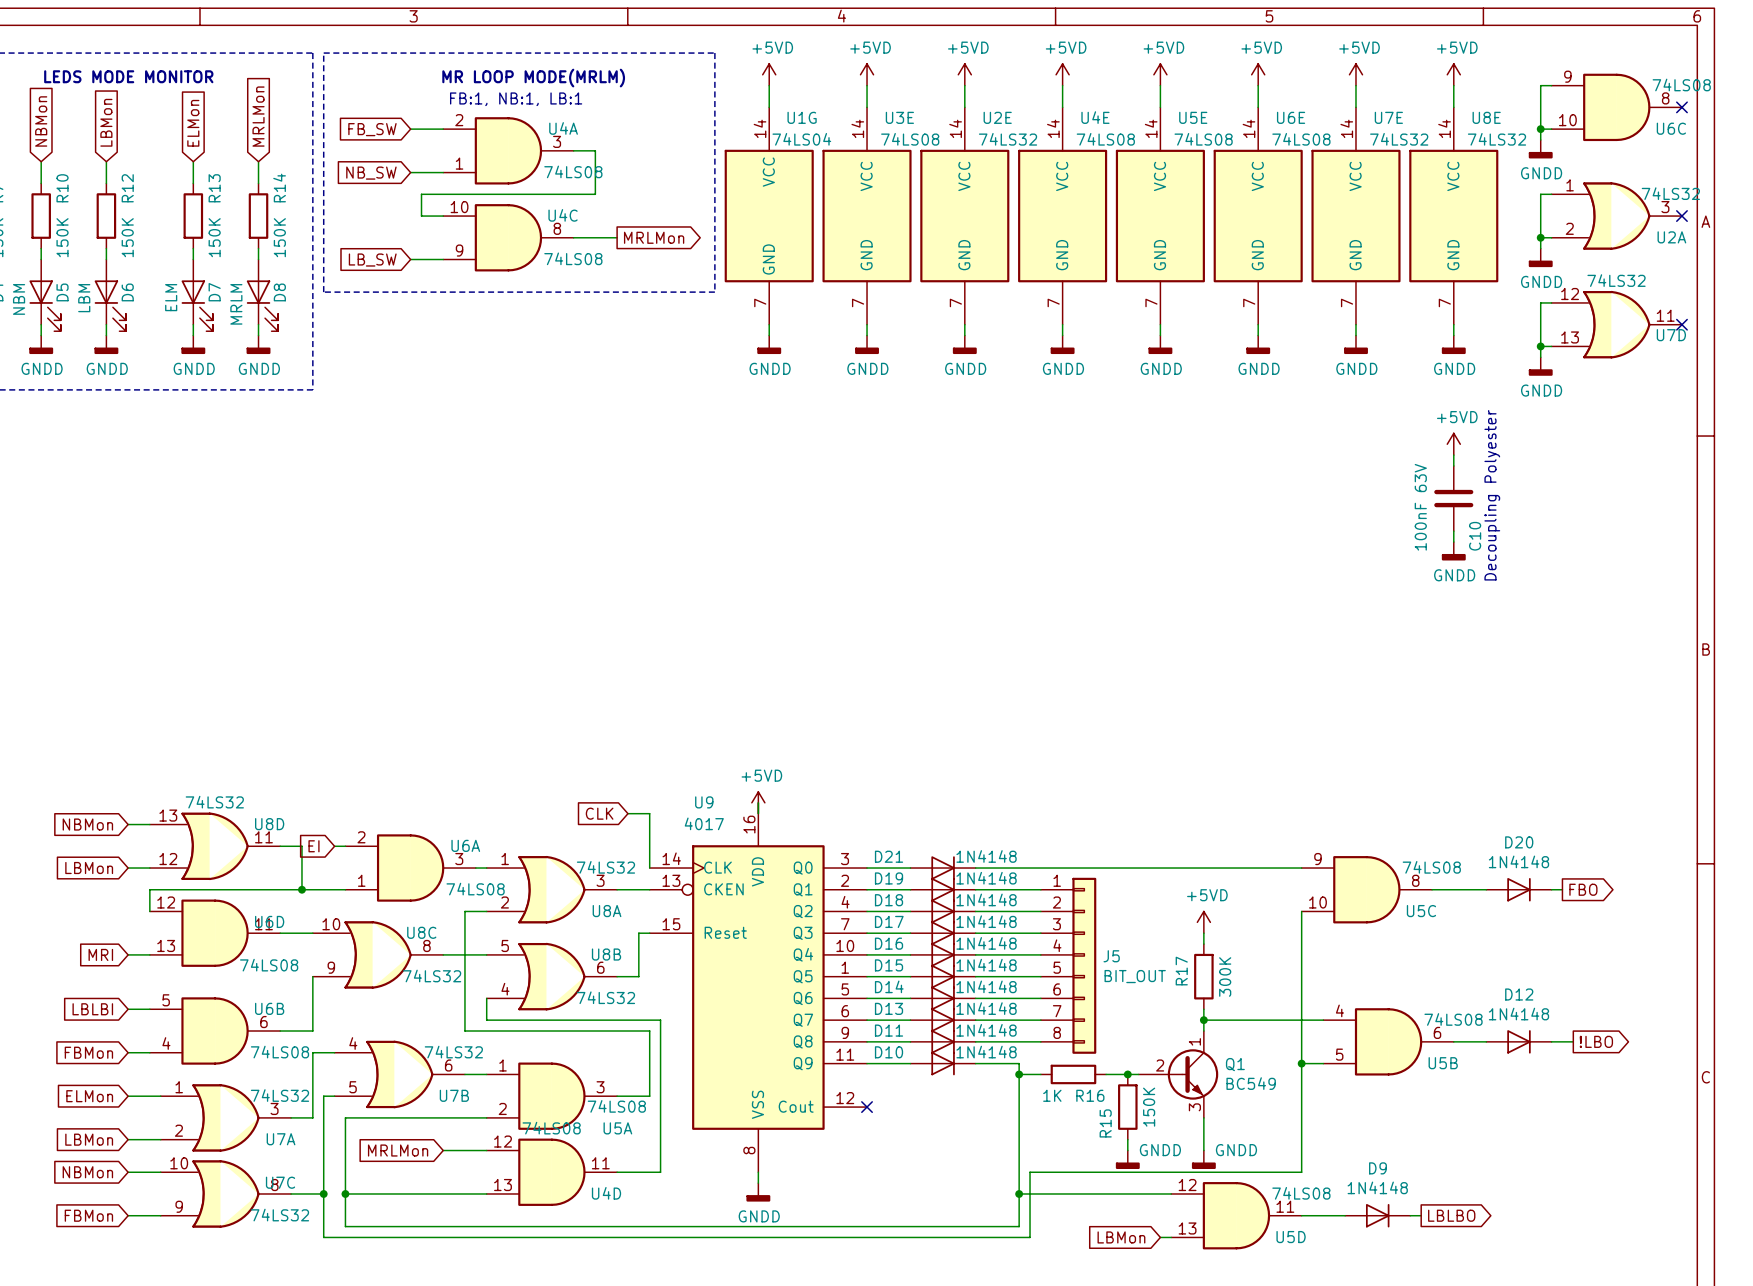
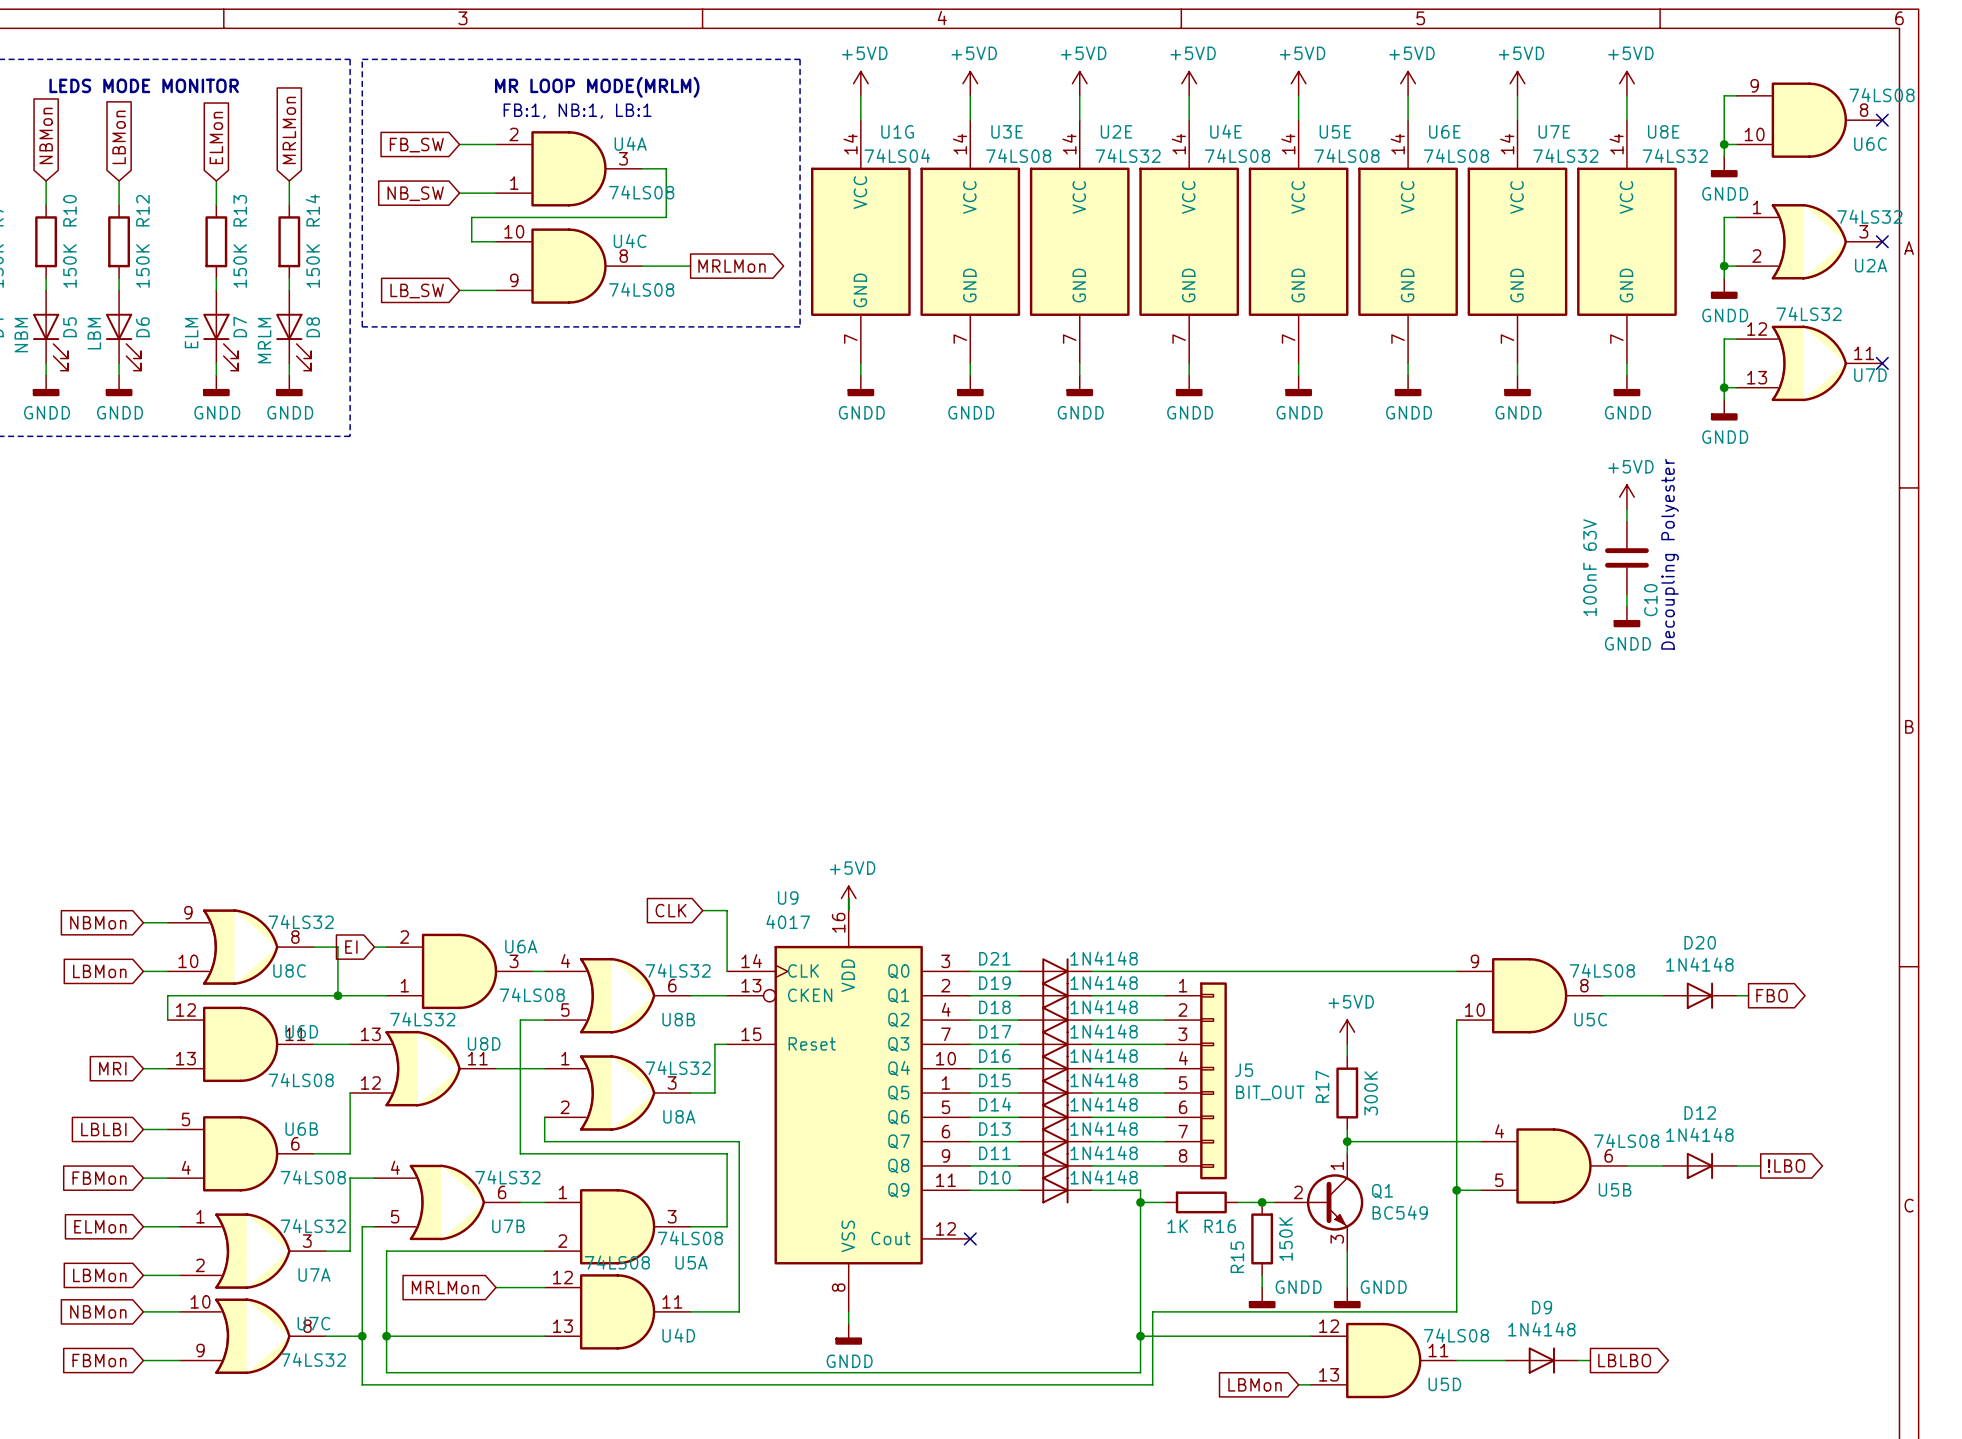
U8D position: (215, 846) -> (423, 1068)
U8A position: (551, 889) -> (617, 1093)
U8C flip: as is (378, 954) -> up-down (240, 947)
U8C position: (378, 954) -> (240, 947)
U8B flip: as is (551, 976) -> up-down (617, 995)
U8B position: (551, 976) -> (617, 995)

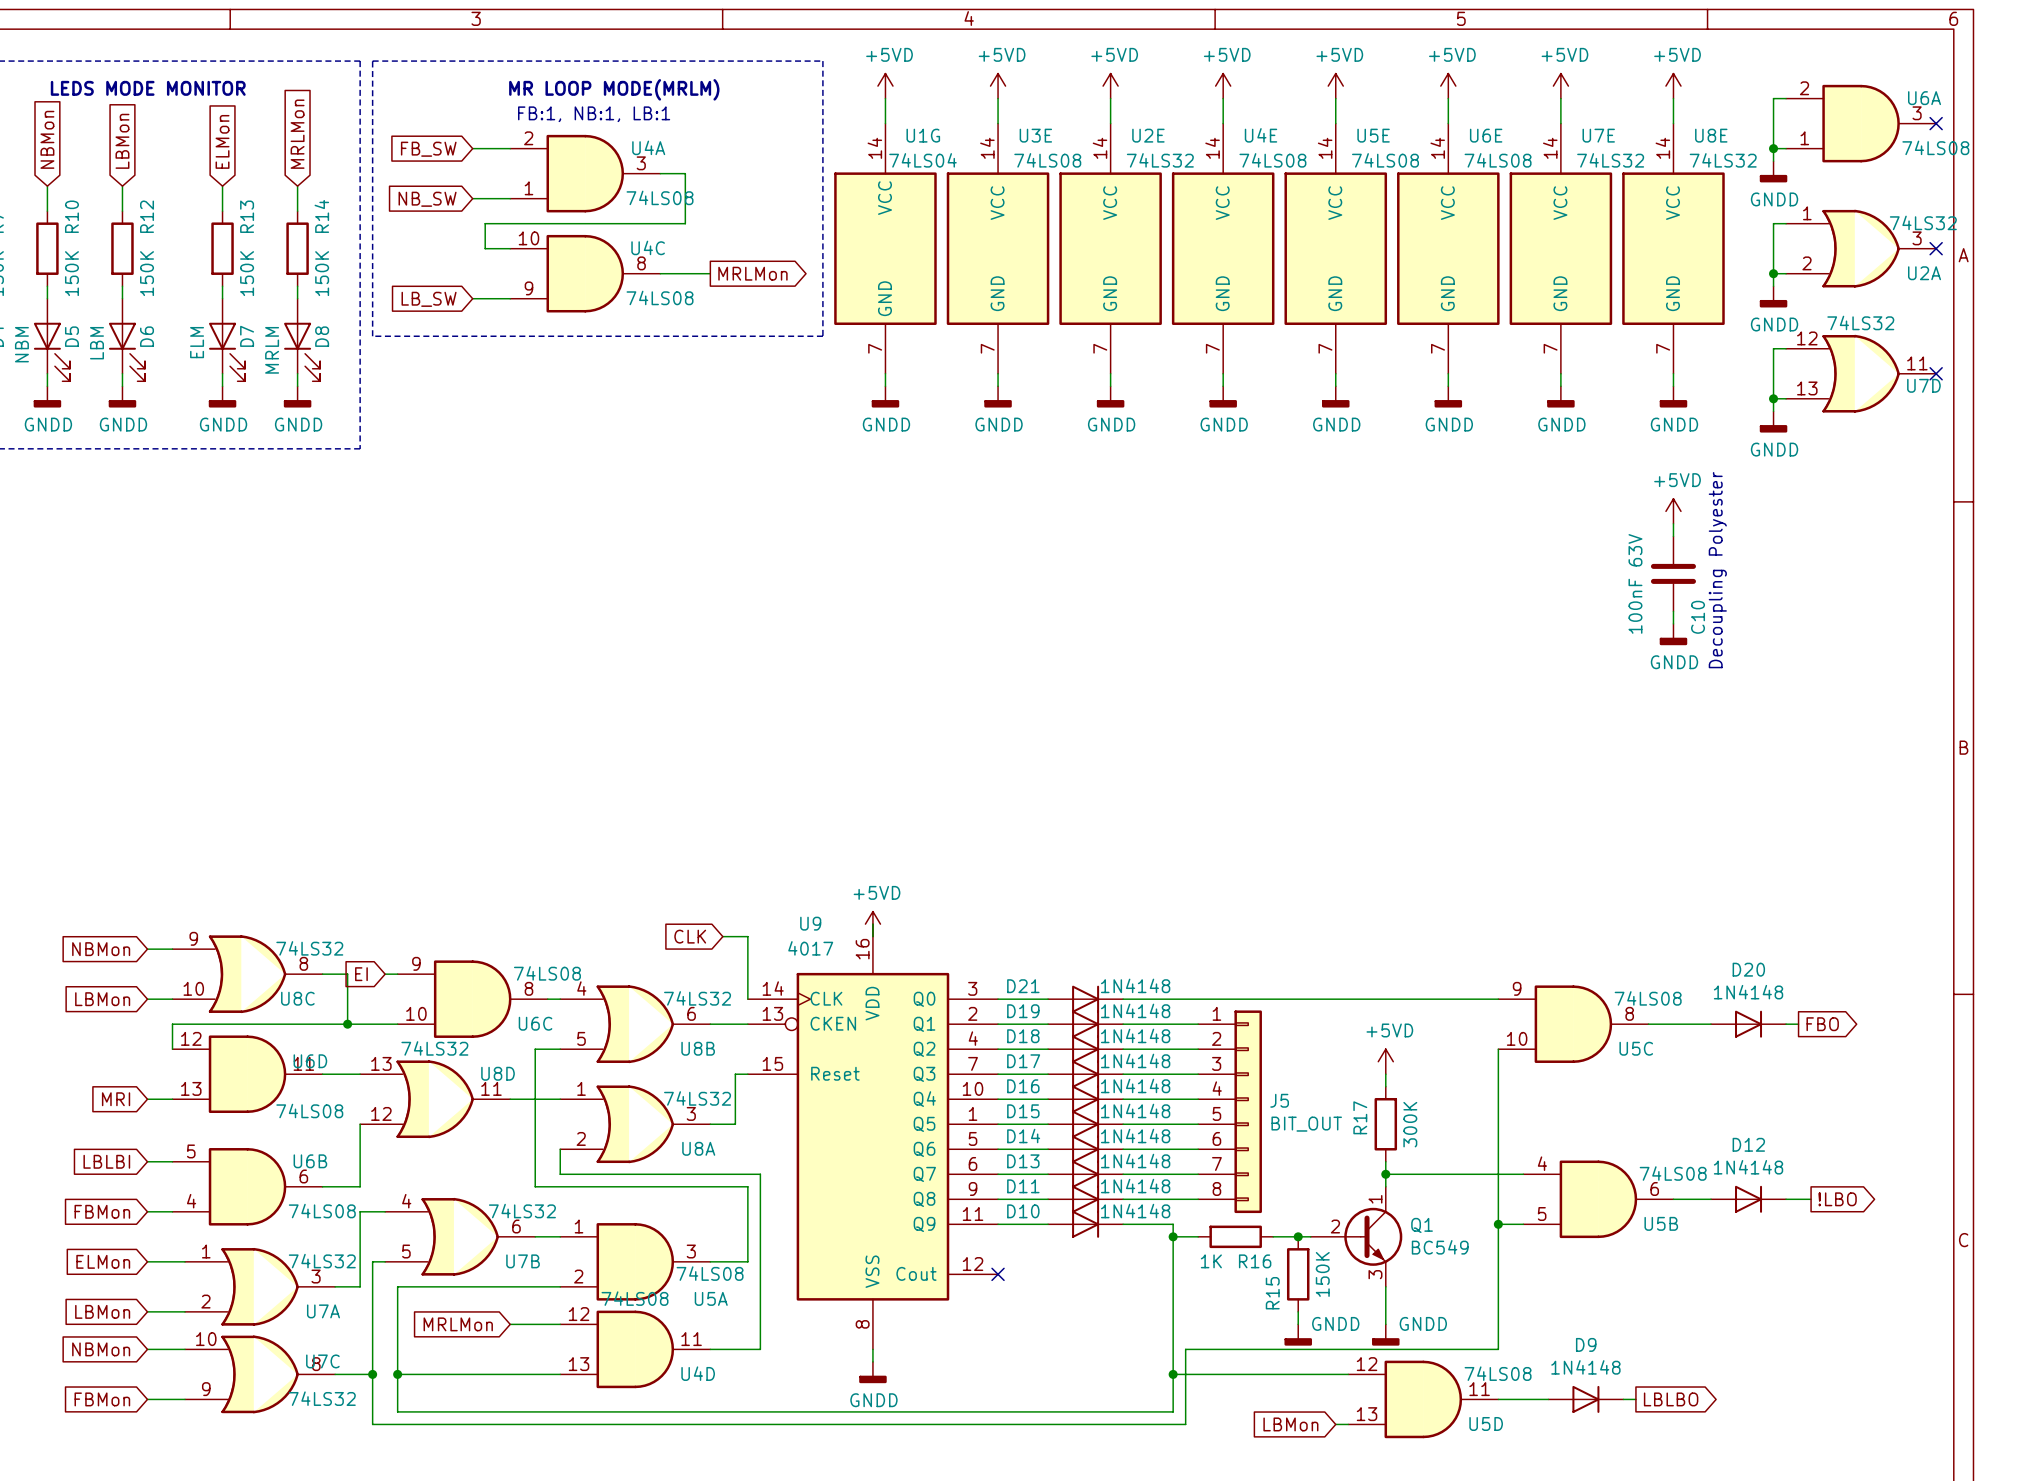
U6C position: (1809, 120) -> (472, 999)
U6A position: (459, 971) -> (1861, 123)

